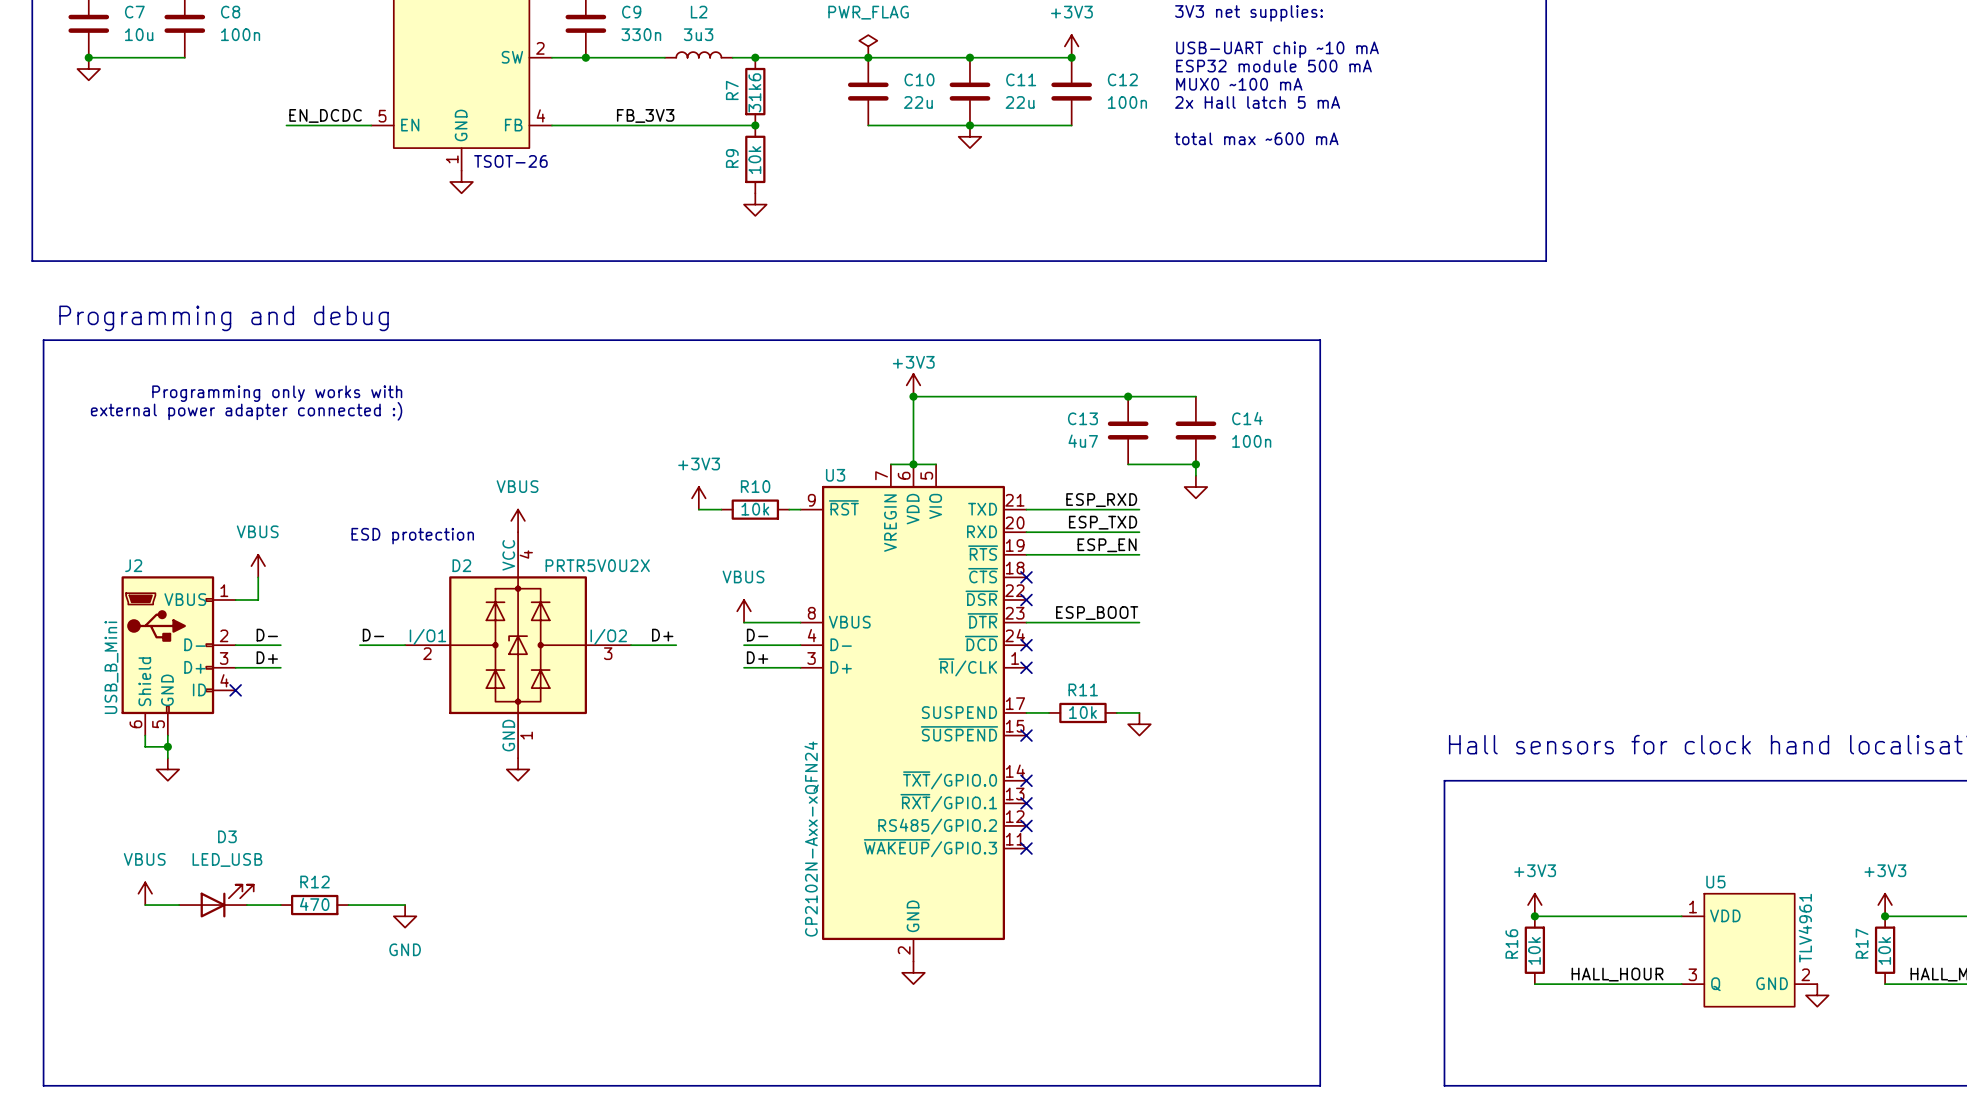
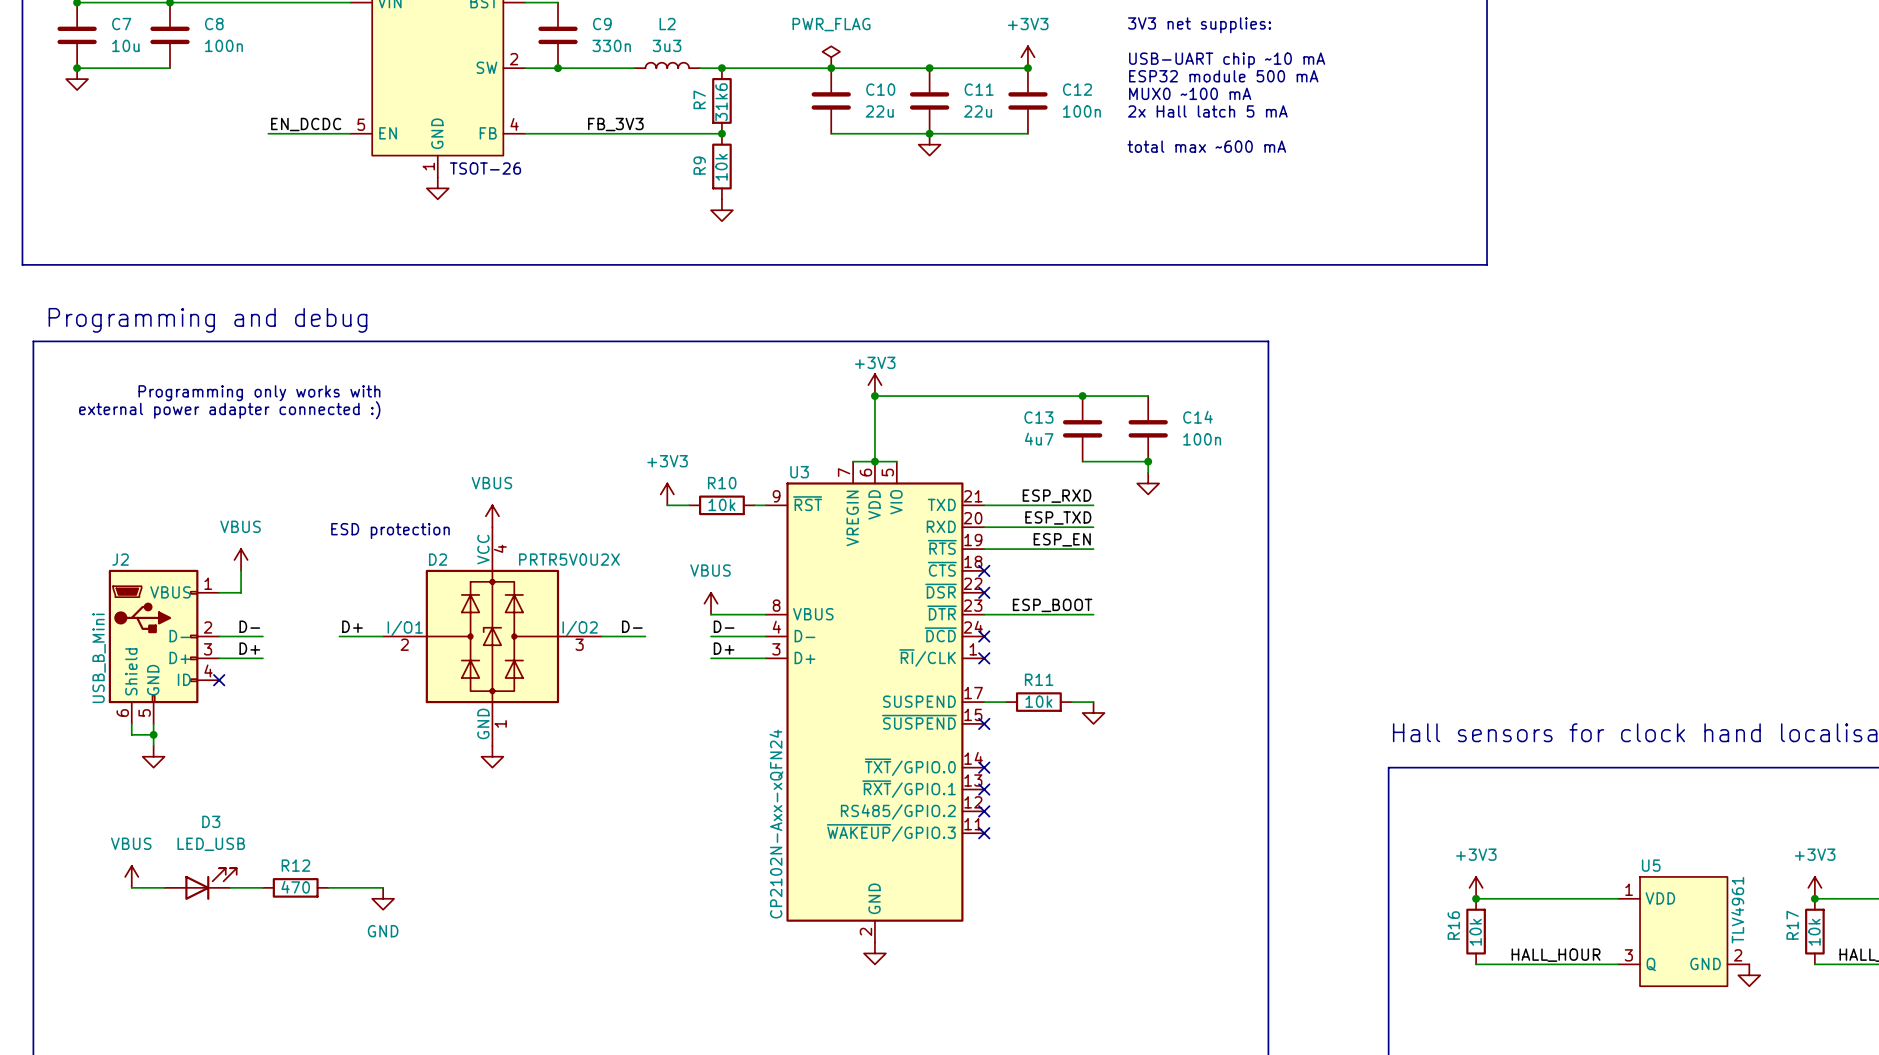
label: D- (373, 635) -> D+ (352, 626)
label: D+ (662, 635) -> D- (632, 626)

